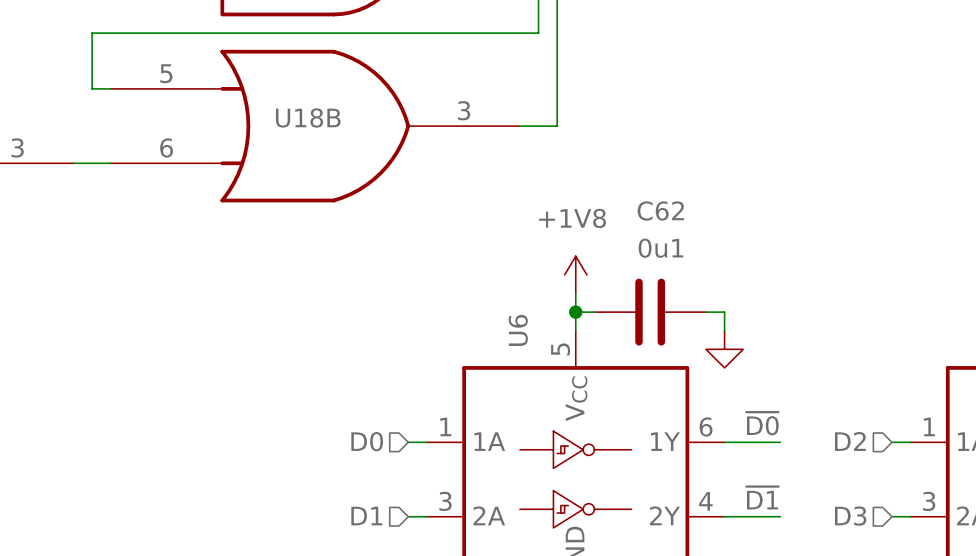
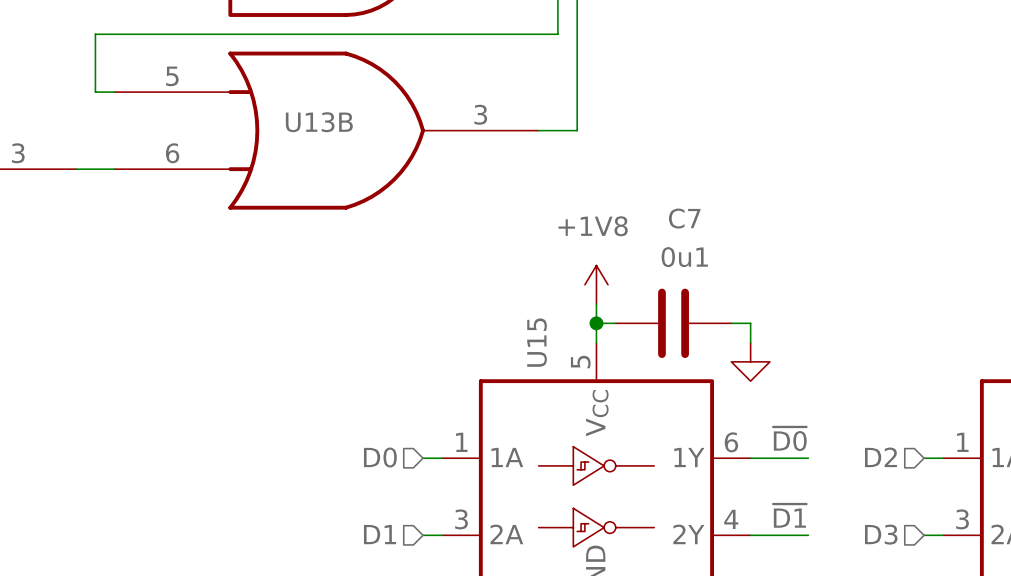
U18B name: U18B (308, 117) -> U13B (319, 122)
C62 name: C62 (660, 210) -> C7 (684, 218)
U6 name: U6 (518, 330) -> U15 (537, 342)

